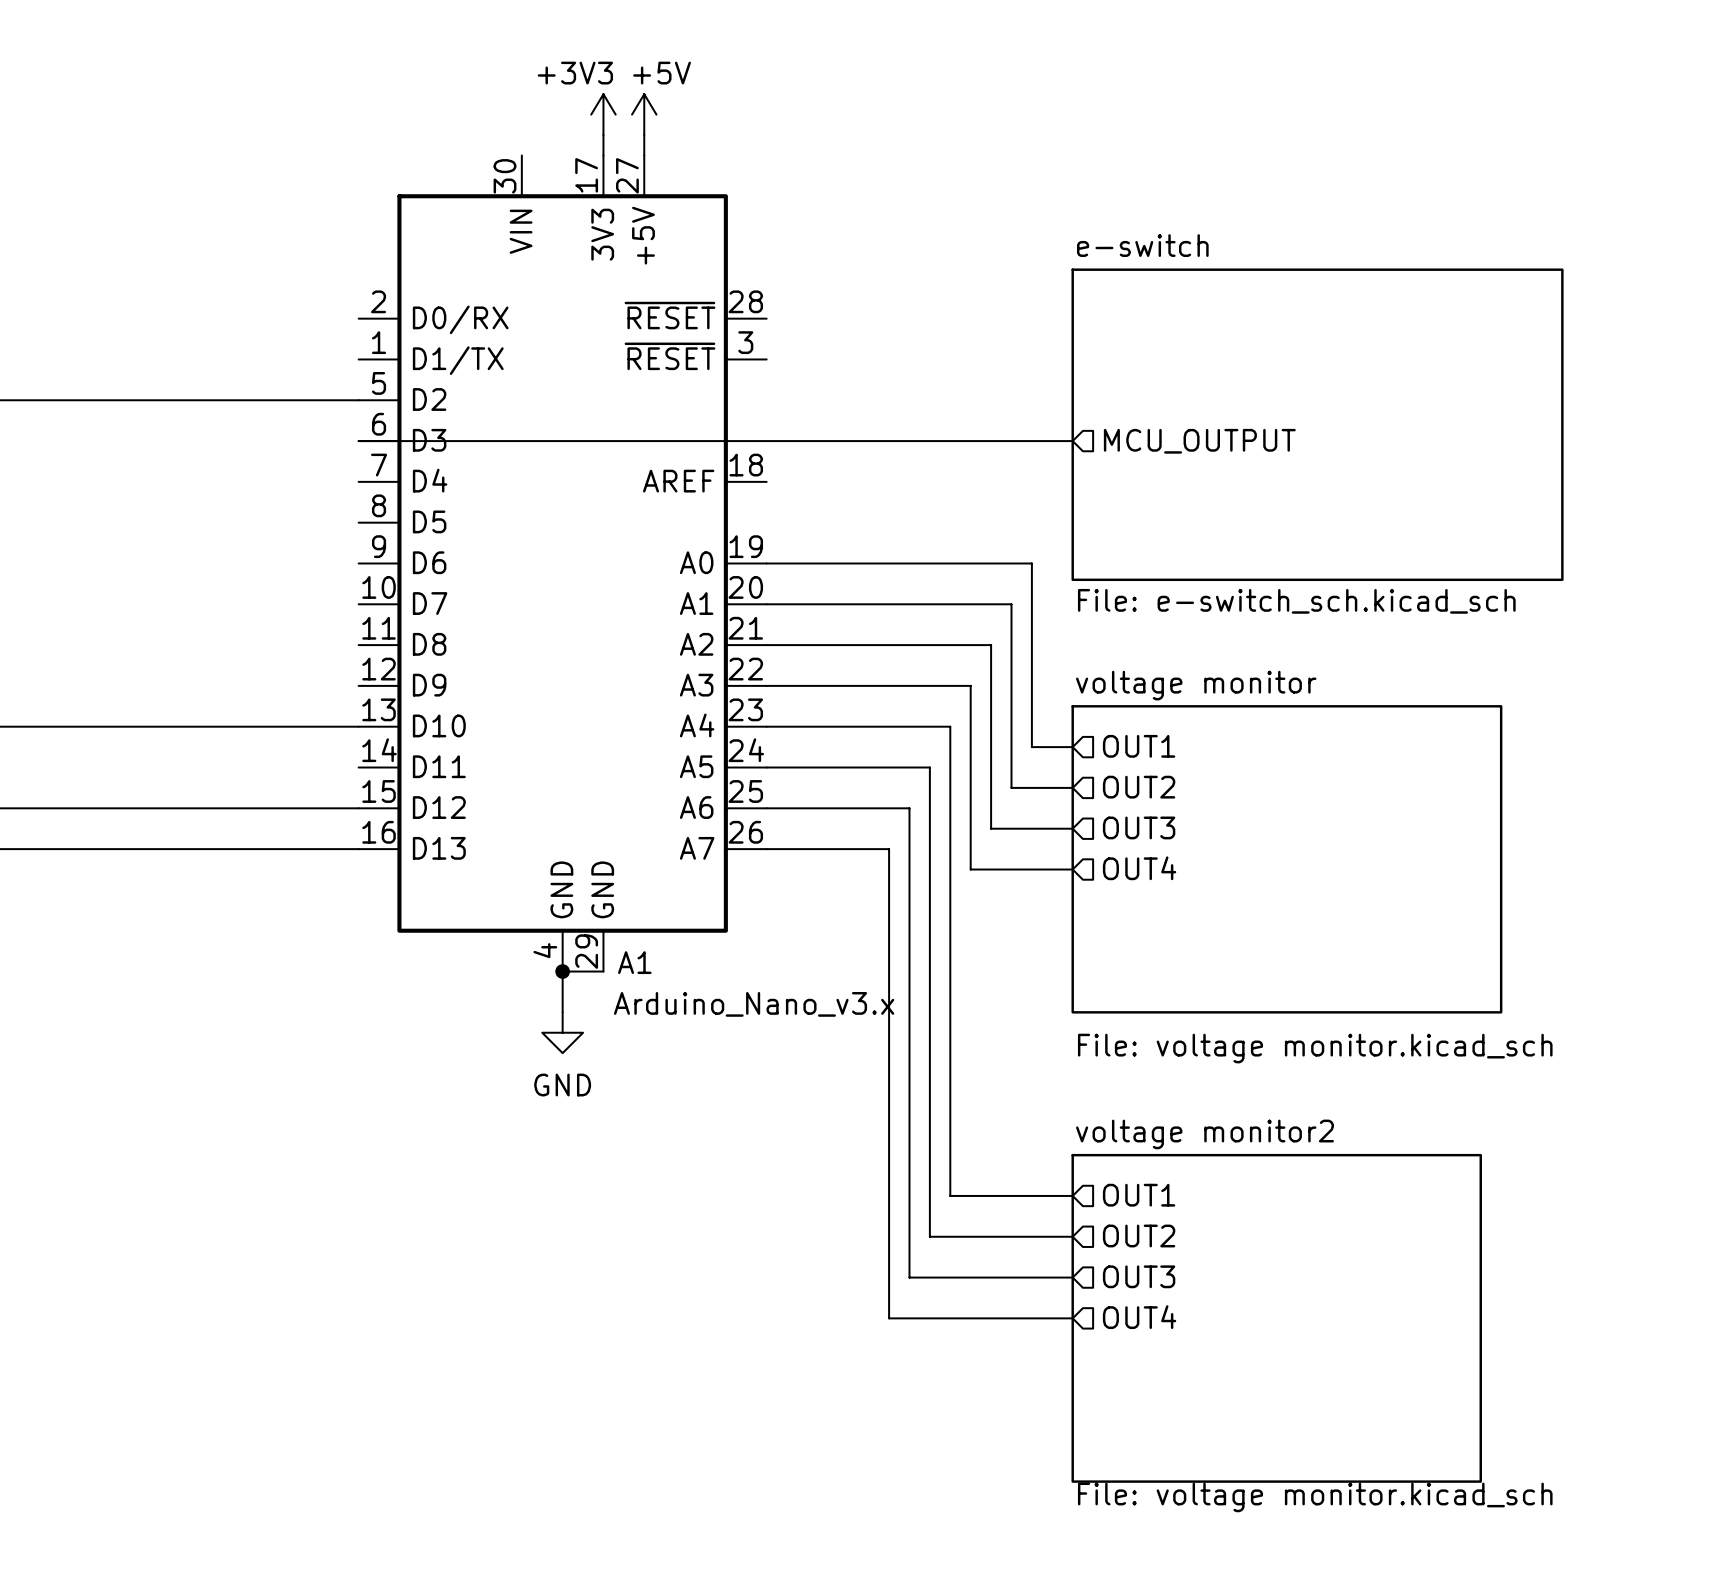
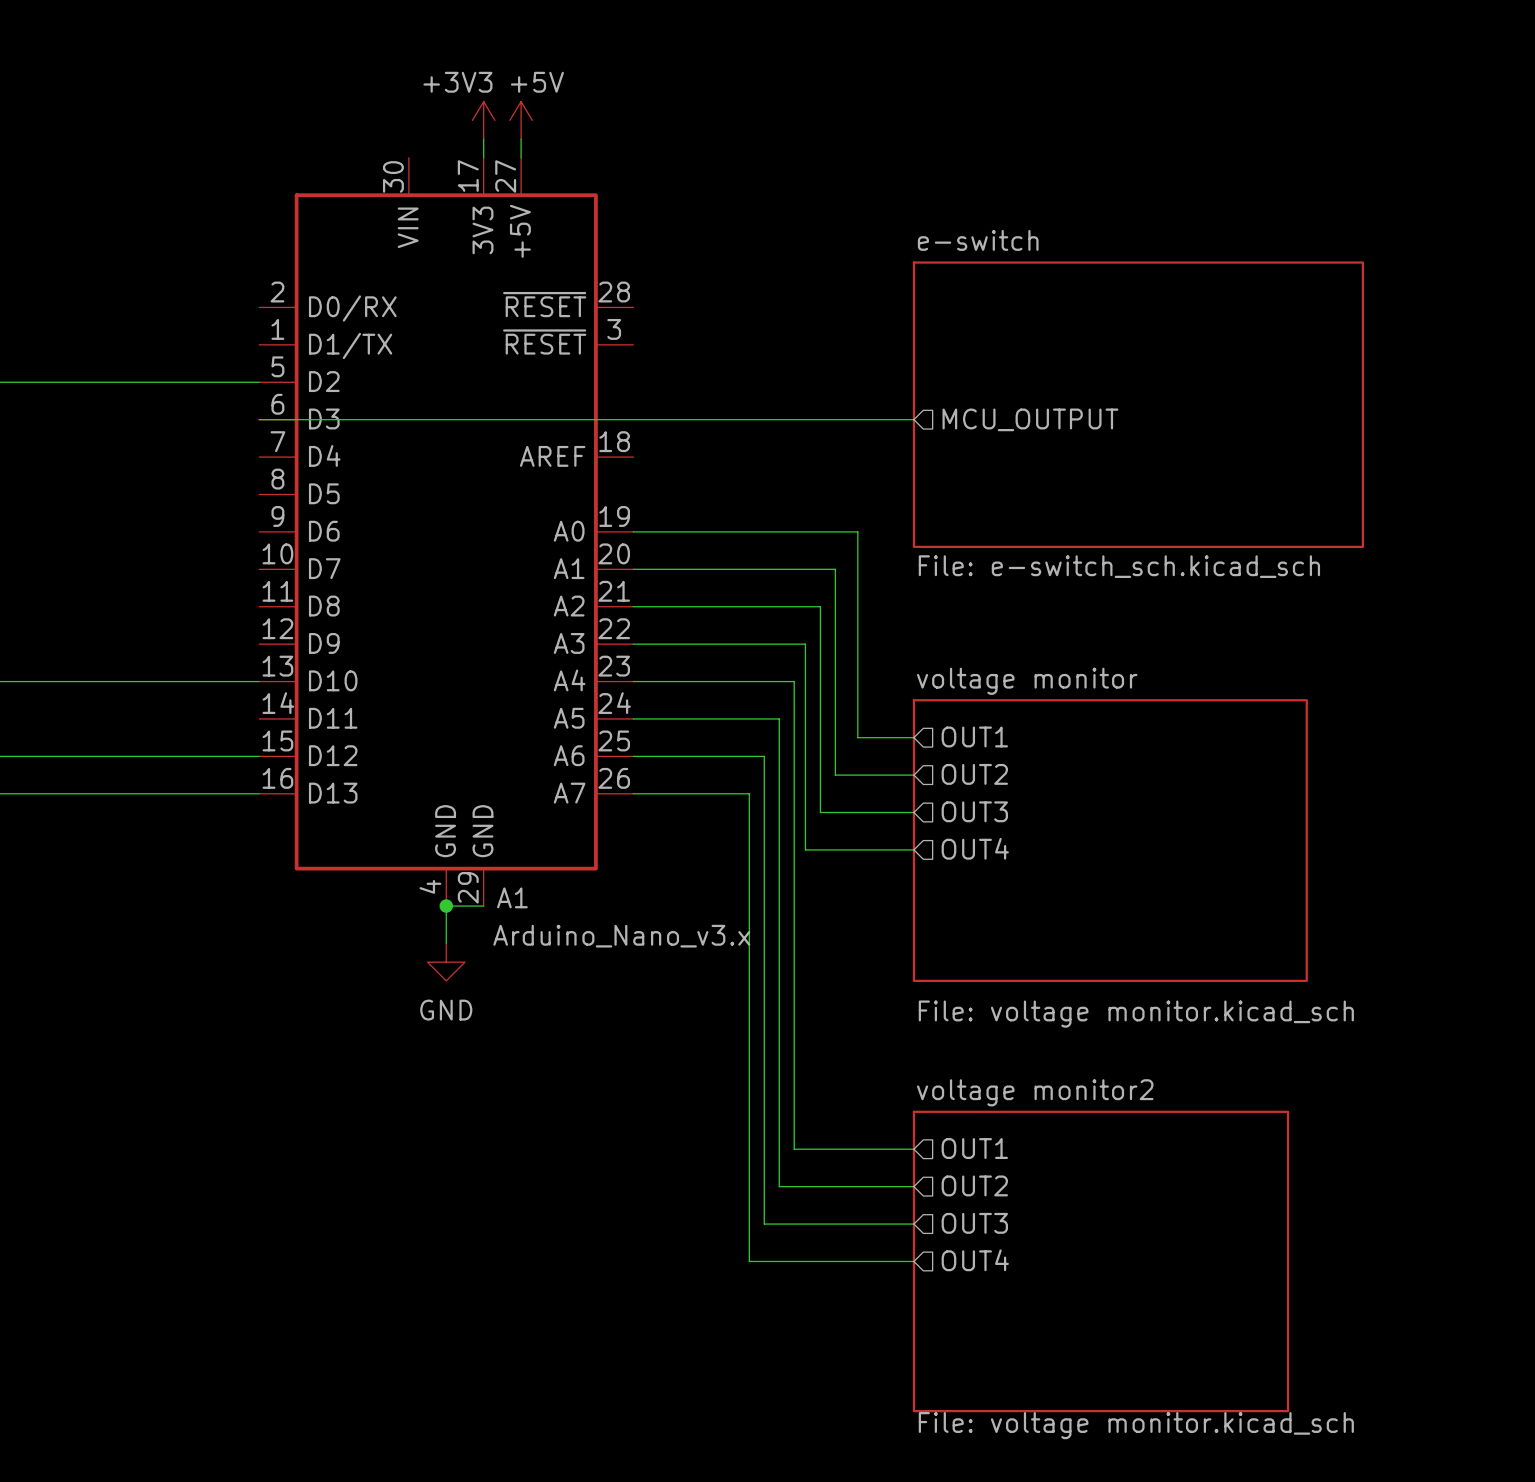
wire: (1011, 563) (1031, 563) (1031, 747) (1072, 747) -> none
wire: (987, 604) (1011, 604) -> (857, 531) (857, 569)
wire: (970, 645) (991, 645) (991, 828) -> (835, 569) (835, 775) (839, 775)
wire: (954, 685) (970, 685) -> (820, 606) (820, 644)
wire: none -> (805, 644) (805, 849) (913, 849)
wire: (942, 726) (950, 726) (950, 1195) (1072, 1195) -> (794, 681) (794, 1149)
sheet pin: OUT1 (1139, 746) -> none
wire: (925, 767) (929, 767) (929, 1236) (942, 1236) -> (779, 718) (779, 1186)
sheet pin: OUT2 (1139, 787) -> OUT1 (974, 736)
sheet pin: OUT3 (1139, 827) -> OUT2 (974, 774)
wire: (889, 849) (889, 1318) (909, 1318) -> (745, 793) (749, 793) (749, 1261) (913, 1261)
sheet voltage monitor position: (1286, 859) -> (1110, 840)
sheet pin: OUT4 (1139, 868) -> OUT3 (974, 811)
sheet pin: none -> OUT4 (975, 848)
sheet pin: OUT1 (1139, 1195) -> none
sheet pin: OUT2 (1139, 1236) -> OUT1 (974, 1148)
sheet pin: OUT3 (1139, 1276) -> OUT2 (974, 1185)
wire: (909, 1277) (925, 1277) -> (764, 1186) (764, 1224)
sheet pin: OUT4 (1139, 1317) -> OUT3 (974, 1223)
sheet voltage monitor2 position: (1276, 1318) -> (1101, 1261)
sheet pin: none -> OUT4 (975, 1260)

